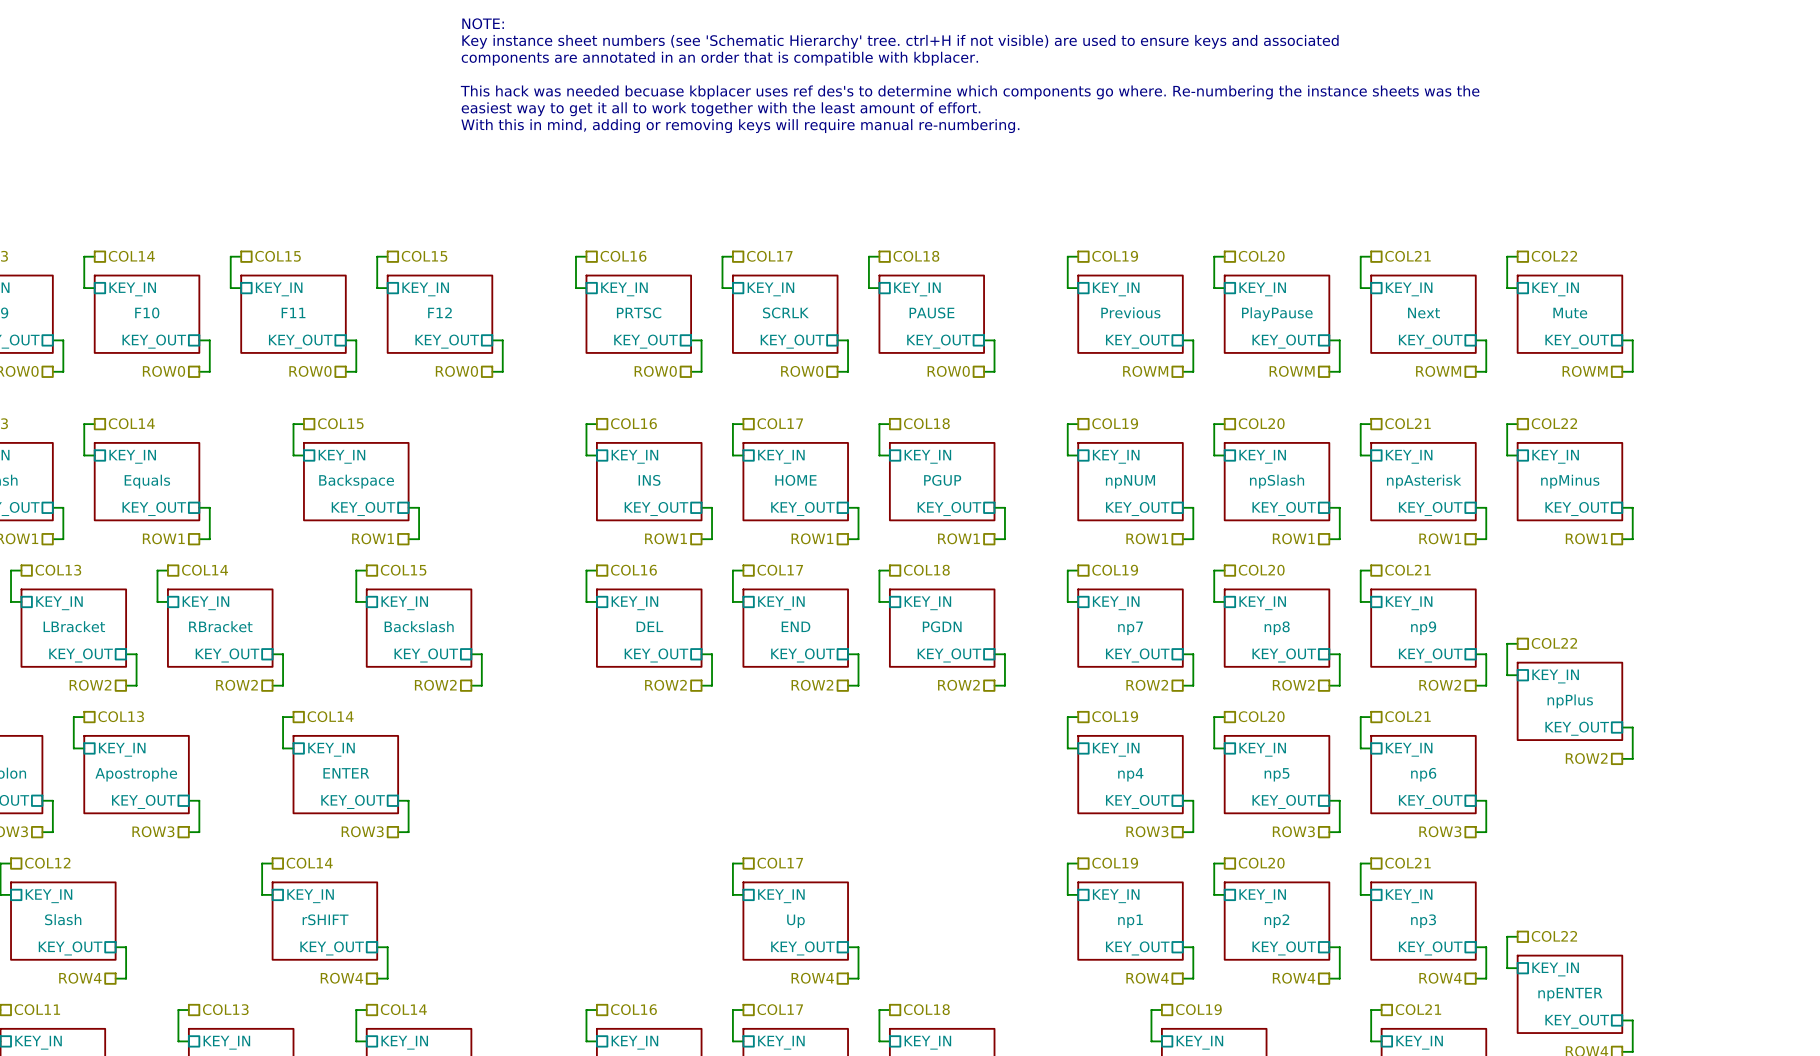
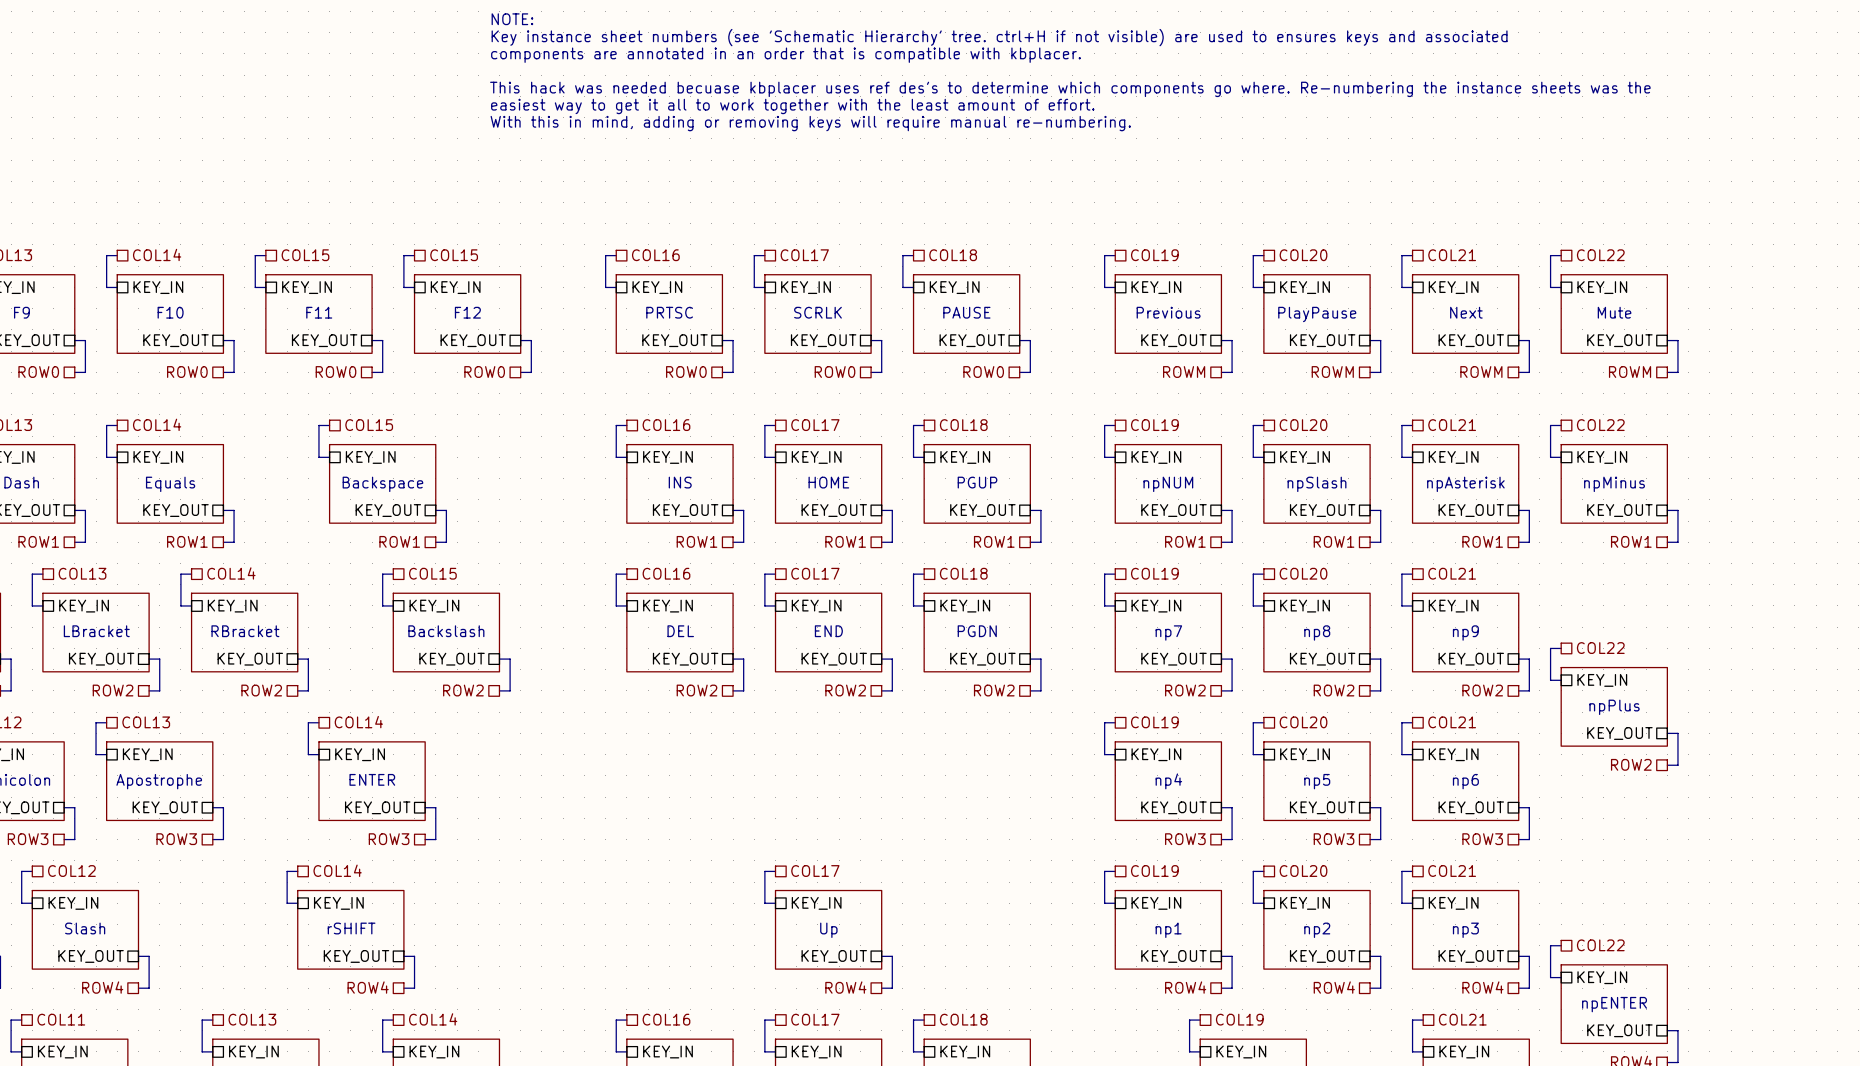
text: Key instance sheet numbers (see 'Schematic Hierarchy' tree. ctrl+H if not visible) are used to ensure keys and associated (900, 41) -> Key instance sheet numbers (see 'Schematic Hierarchy' tree. ctrl+H if not visible) are used to ensures keys and associated (999, 37)

